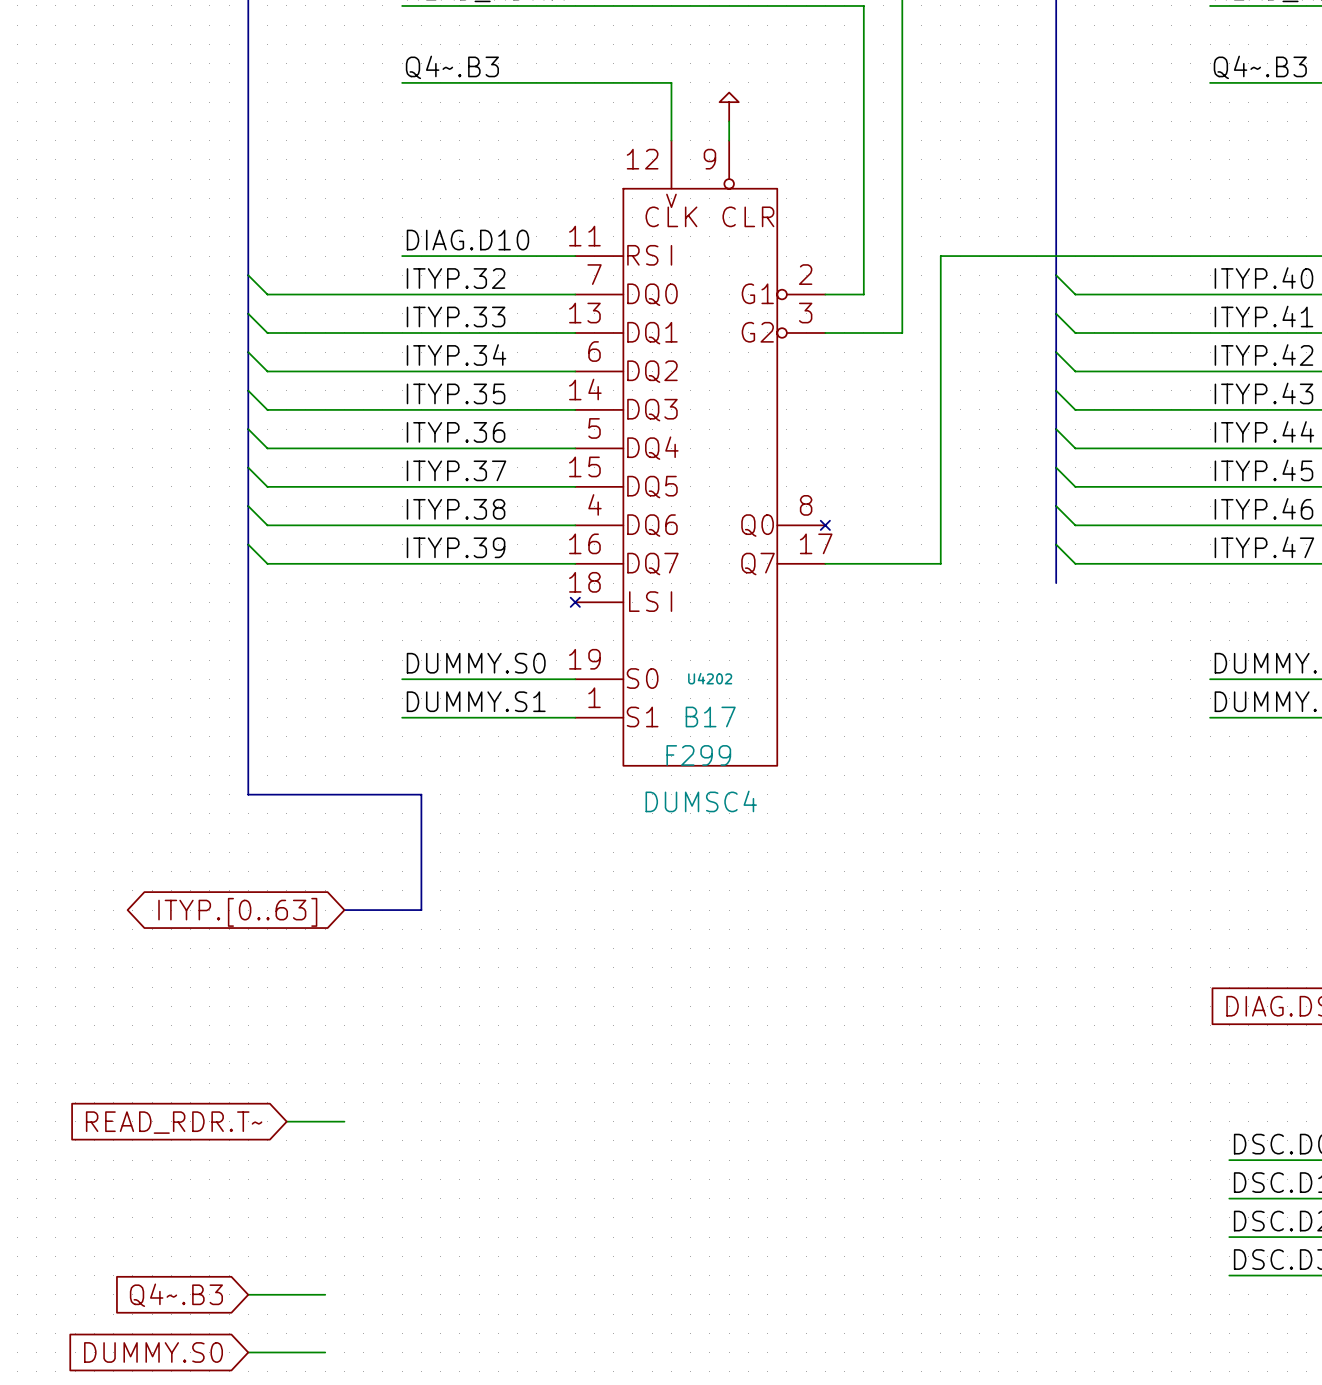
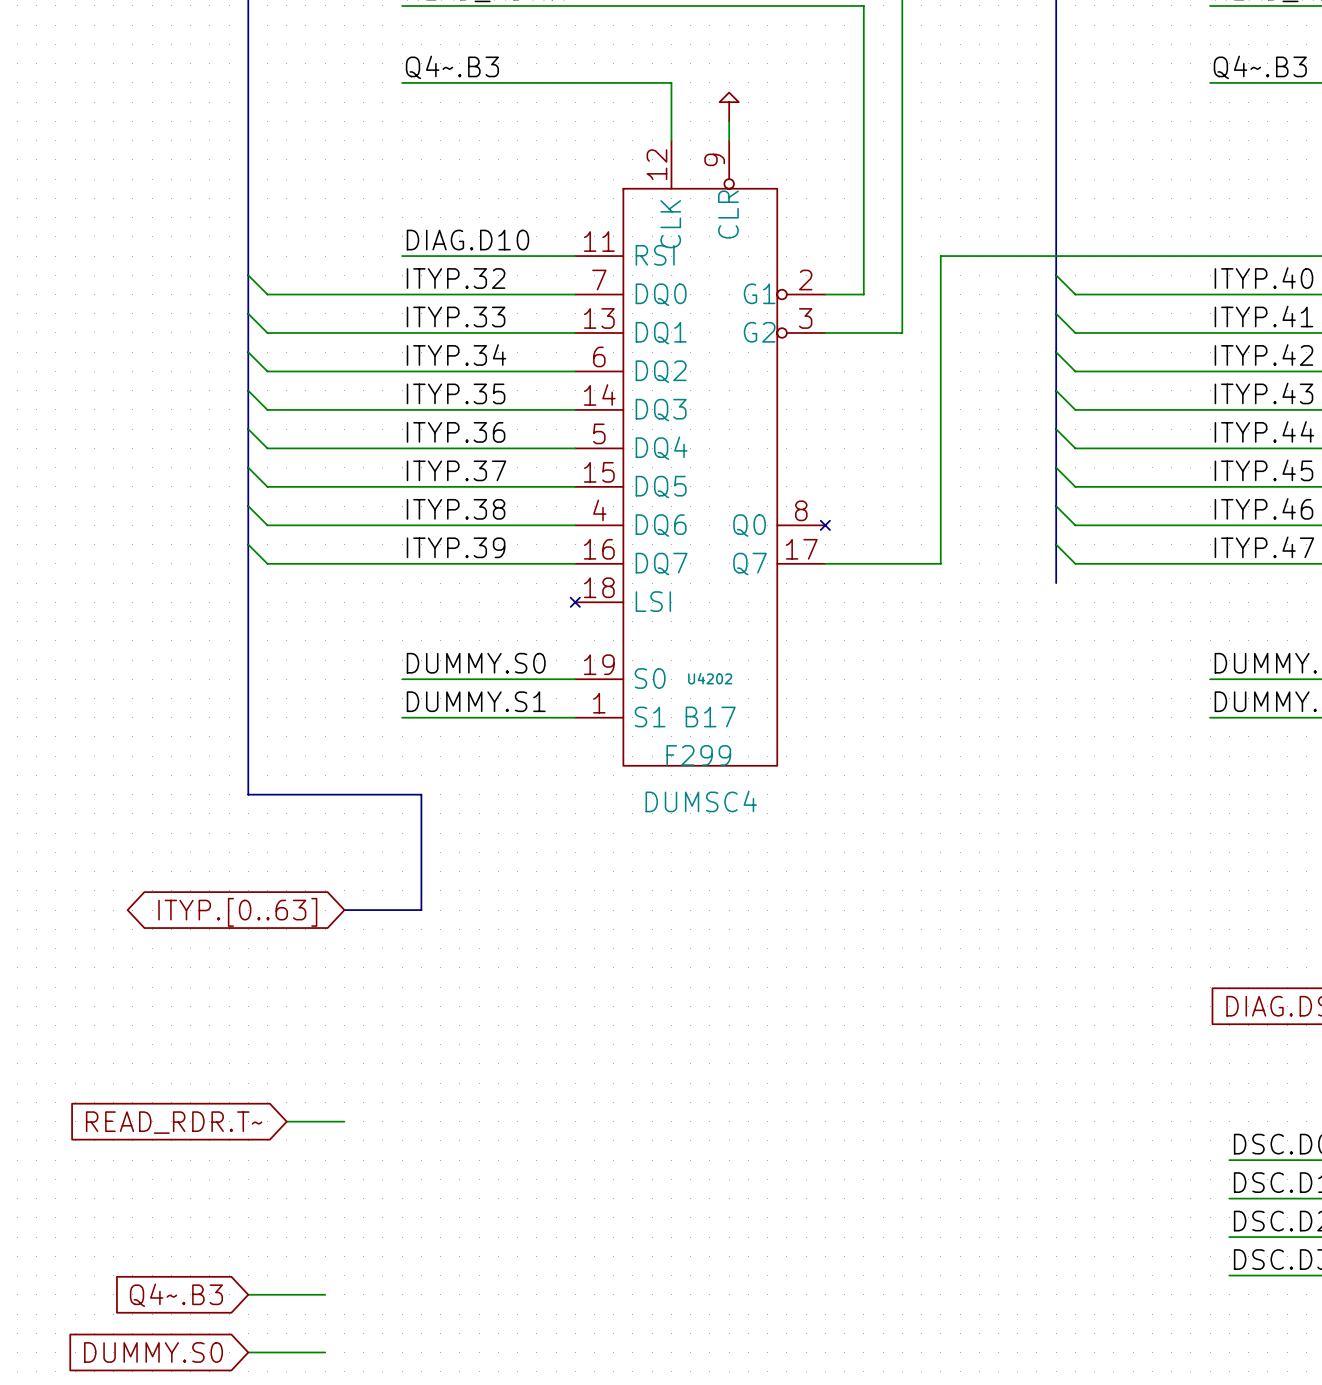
U4202 symbol: [575, 140, 826, 766] -> [575, 140, 826, 766]

